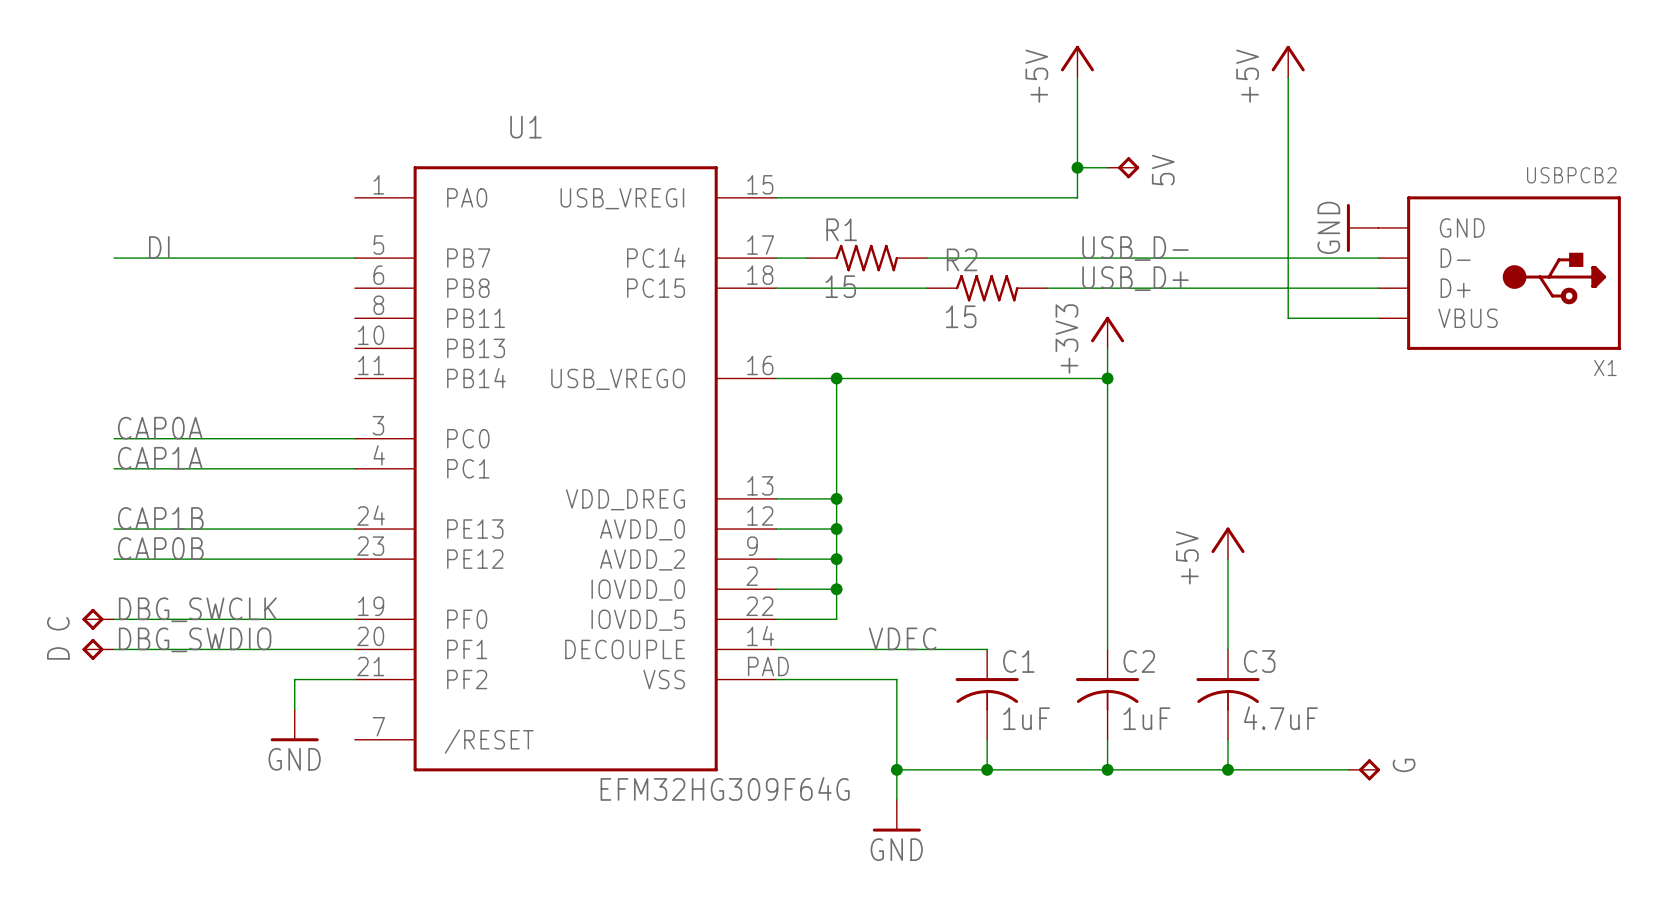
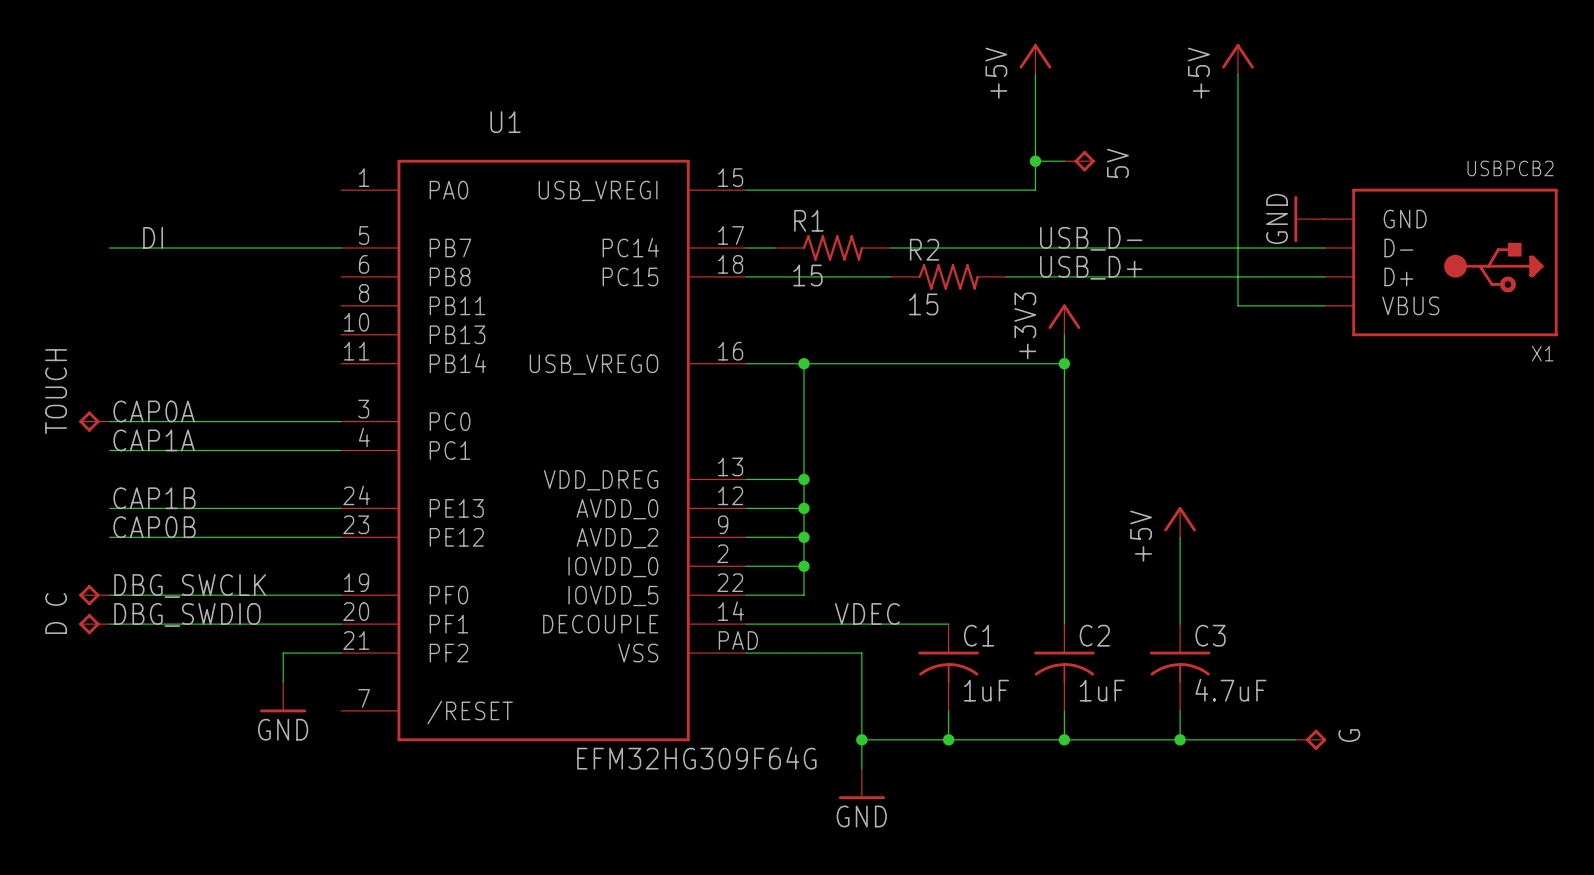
TOUCH: none -> (94, 421)

